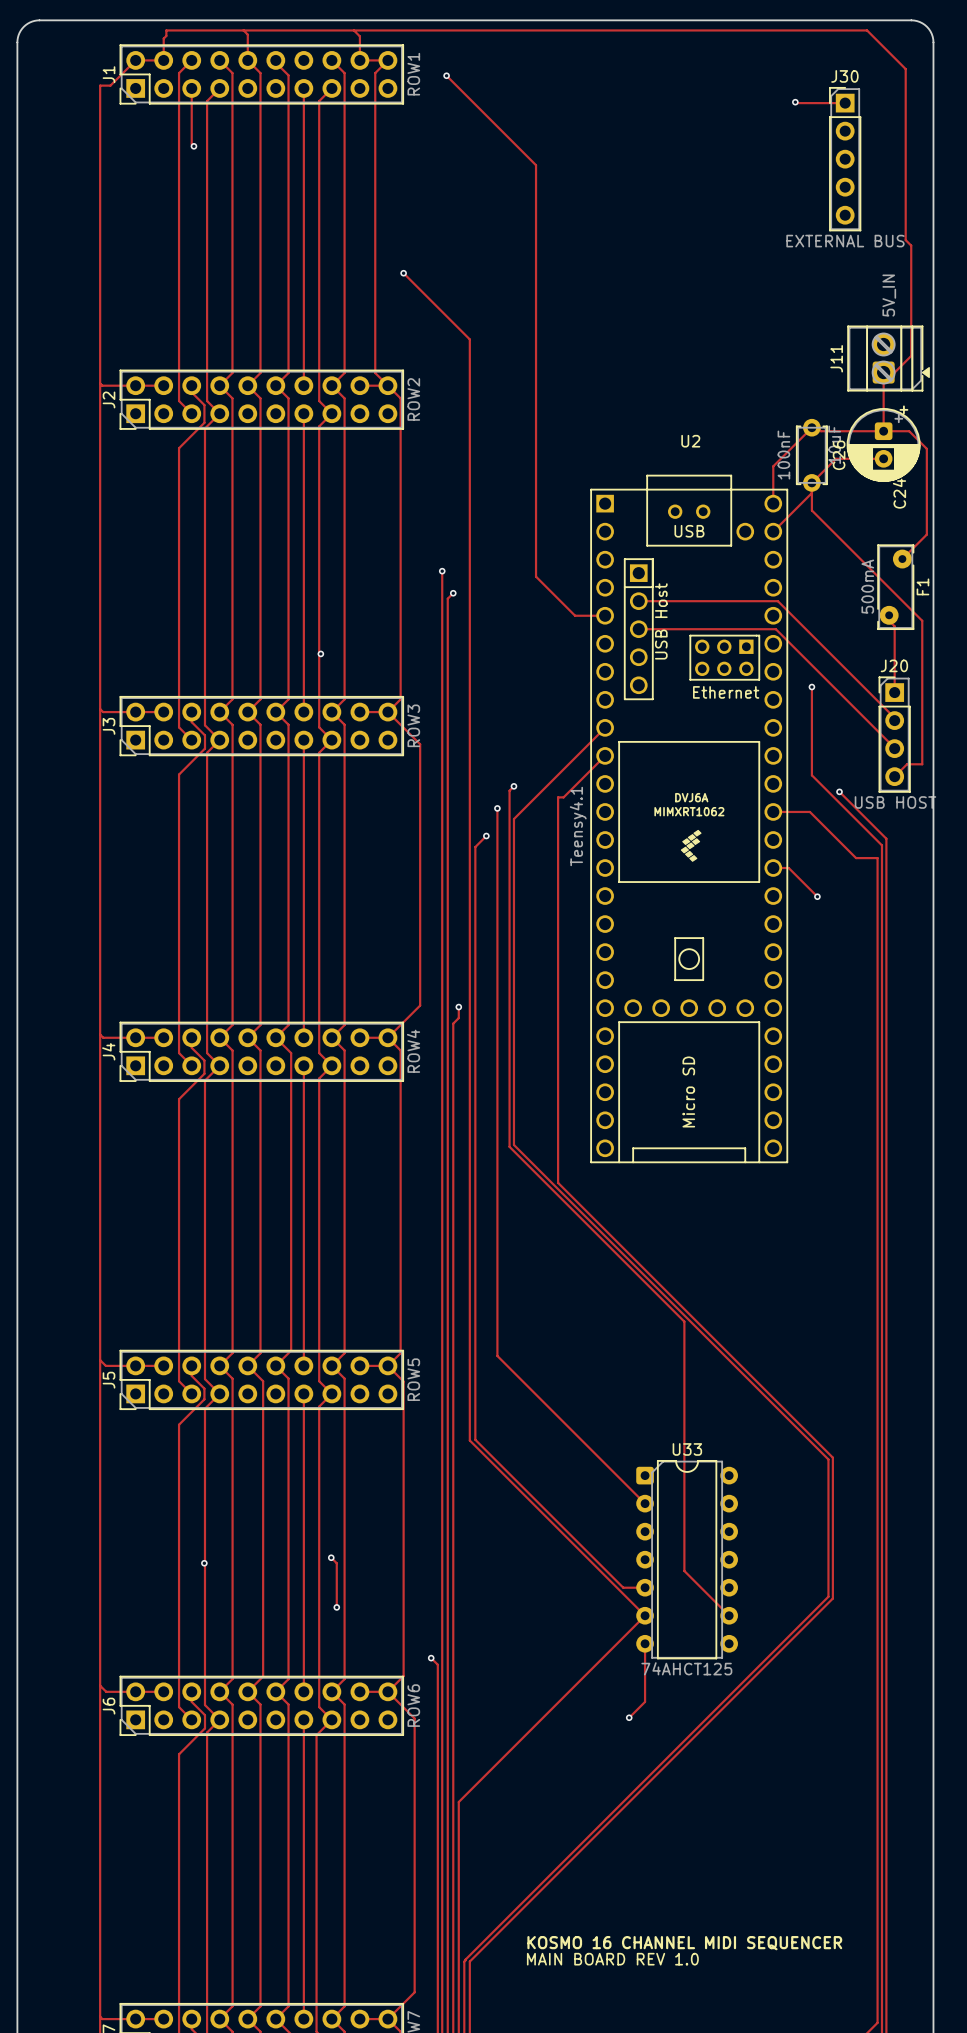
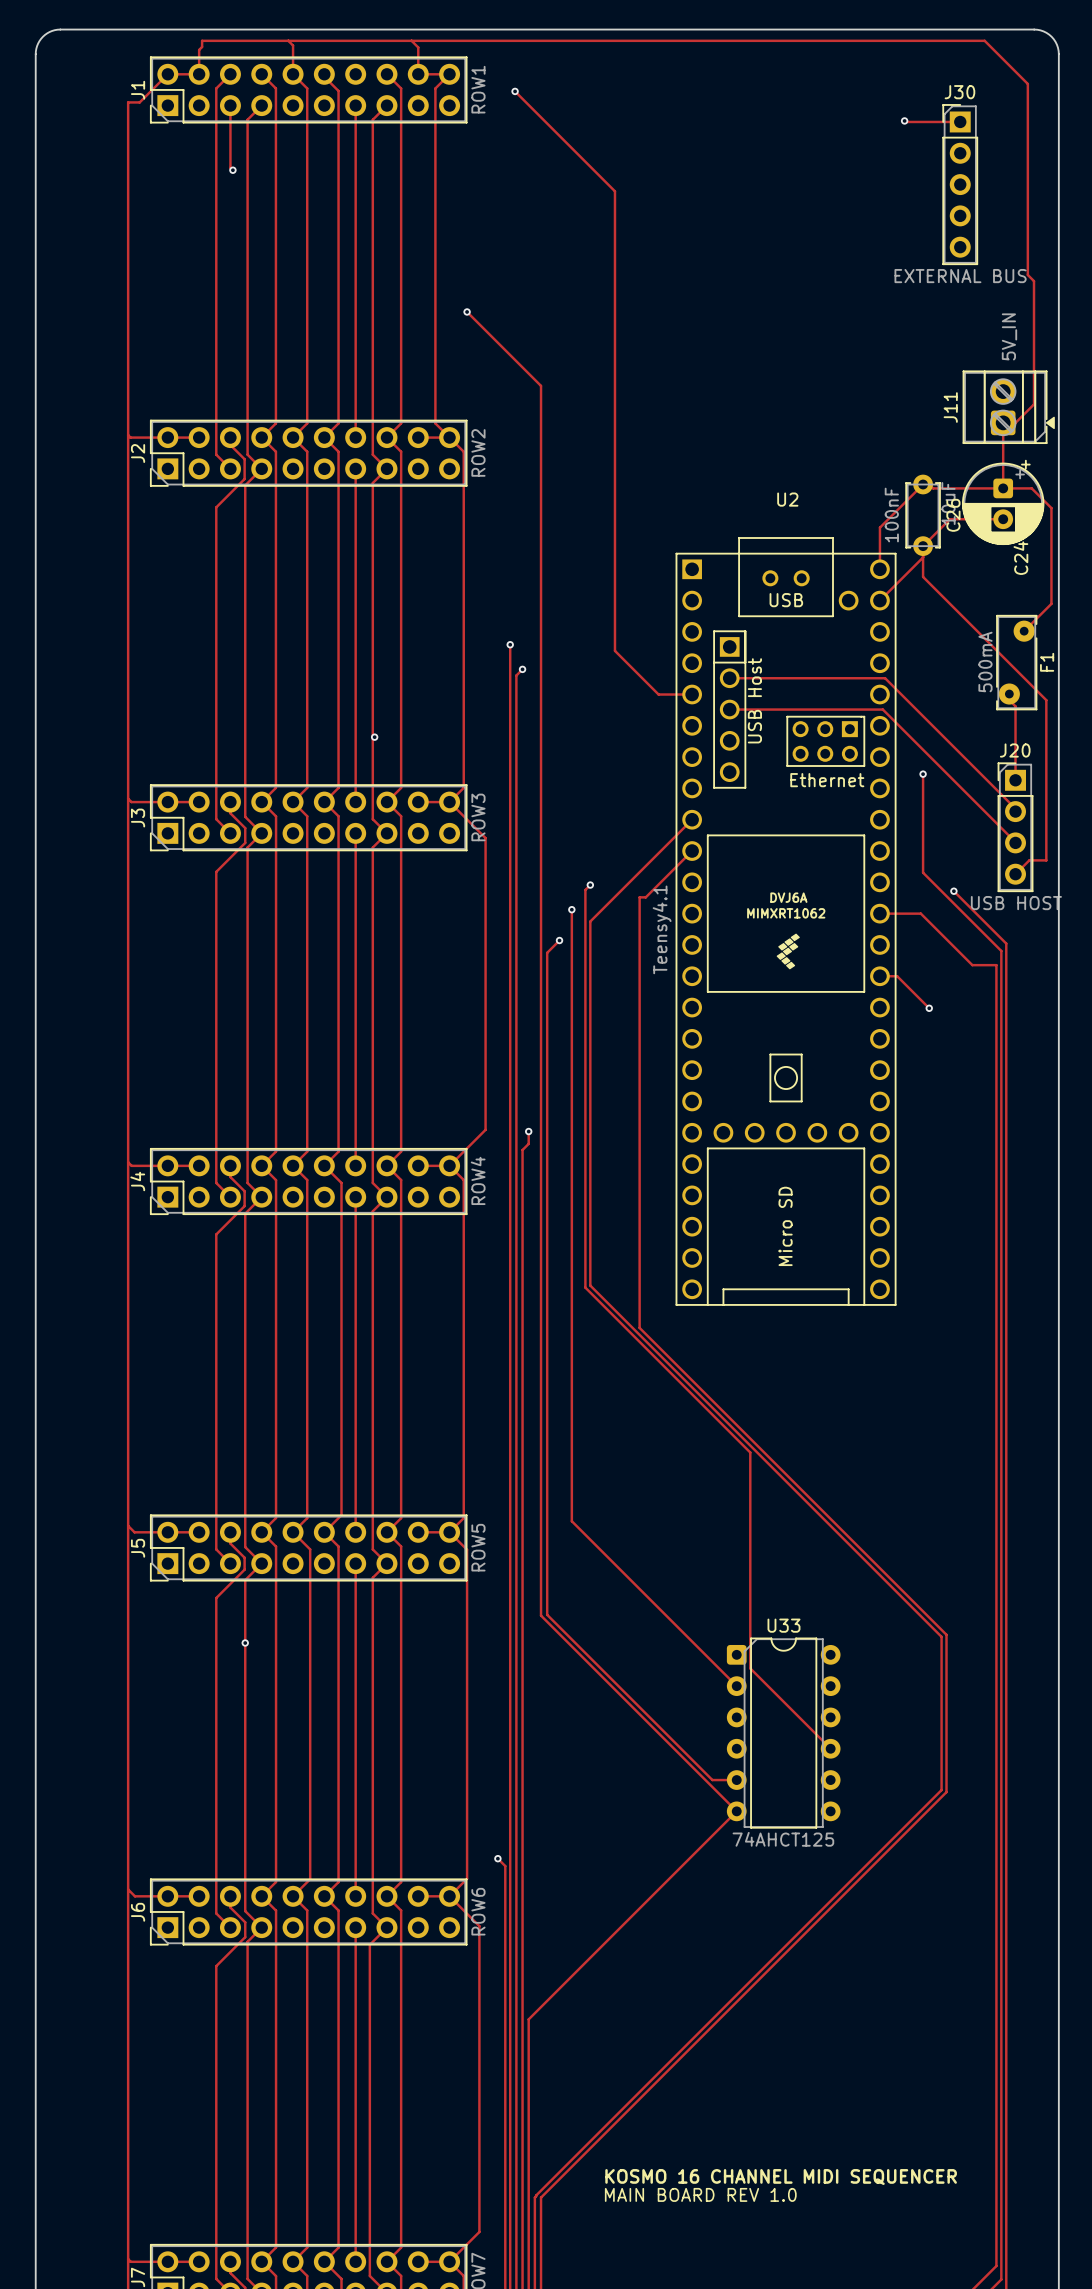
track: (657, 1294) (684, 1321) (684, 1570) (729, 1615) -> (750, 1452) (750, 1668) (830, 1748)
U33 footprint: [636, 1460, 738, 1660] -> [726, 1637, 841, 1829]
via: none -> (245, 1643)
track: (331, 1557) (336, 1563) (336, 1607) -> none
via: (331, 1557) -> none
via: (204, 1563) -> none
via: (336, 1607) -> none
track: (645, 1643) (645, 1701) (629, 1717) -> none
via: (629, 1717) -> none

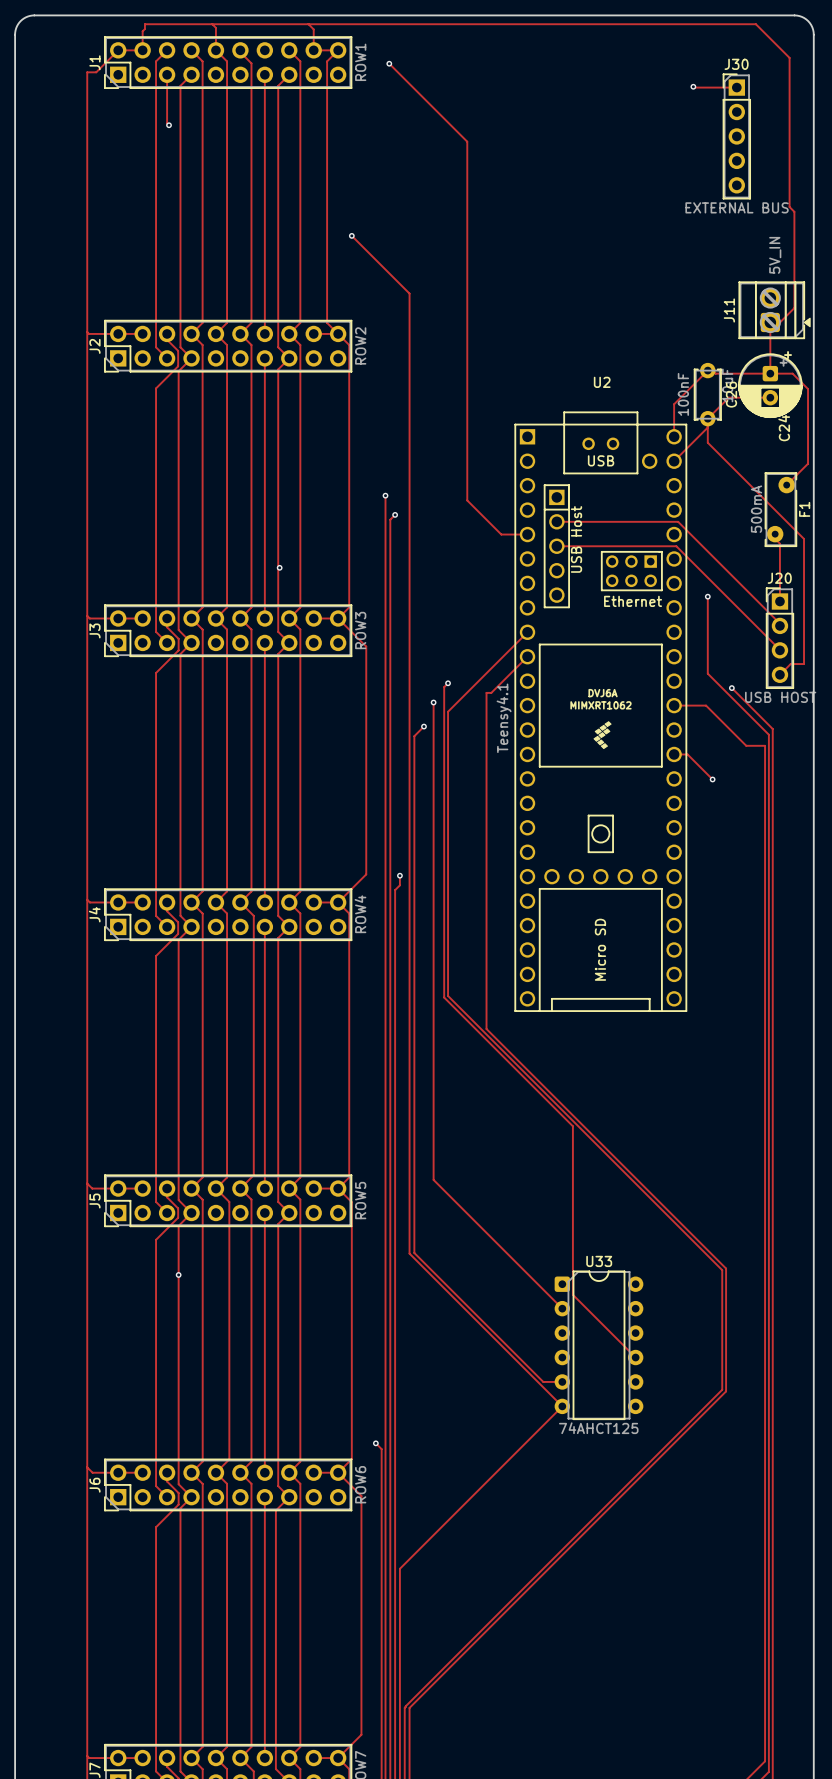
text: KOSMO 16 CHANNEL MIDI SEQUENCER (781, 2177) -> none
text: MAIN BOARD REV 1.0 (700, 2194) -> none

